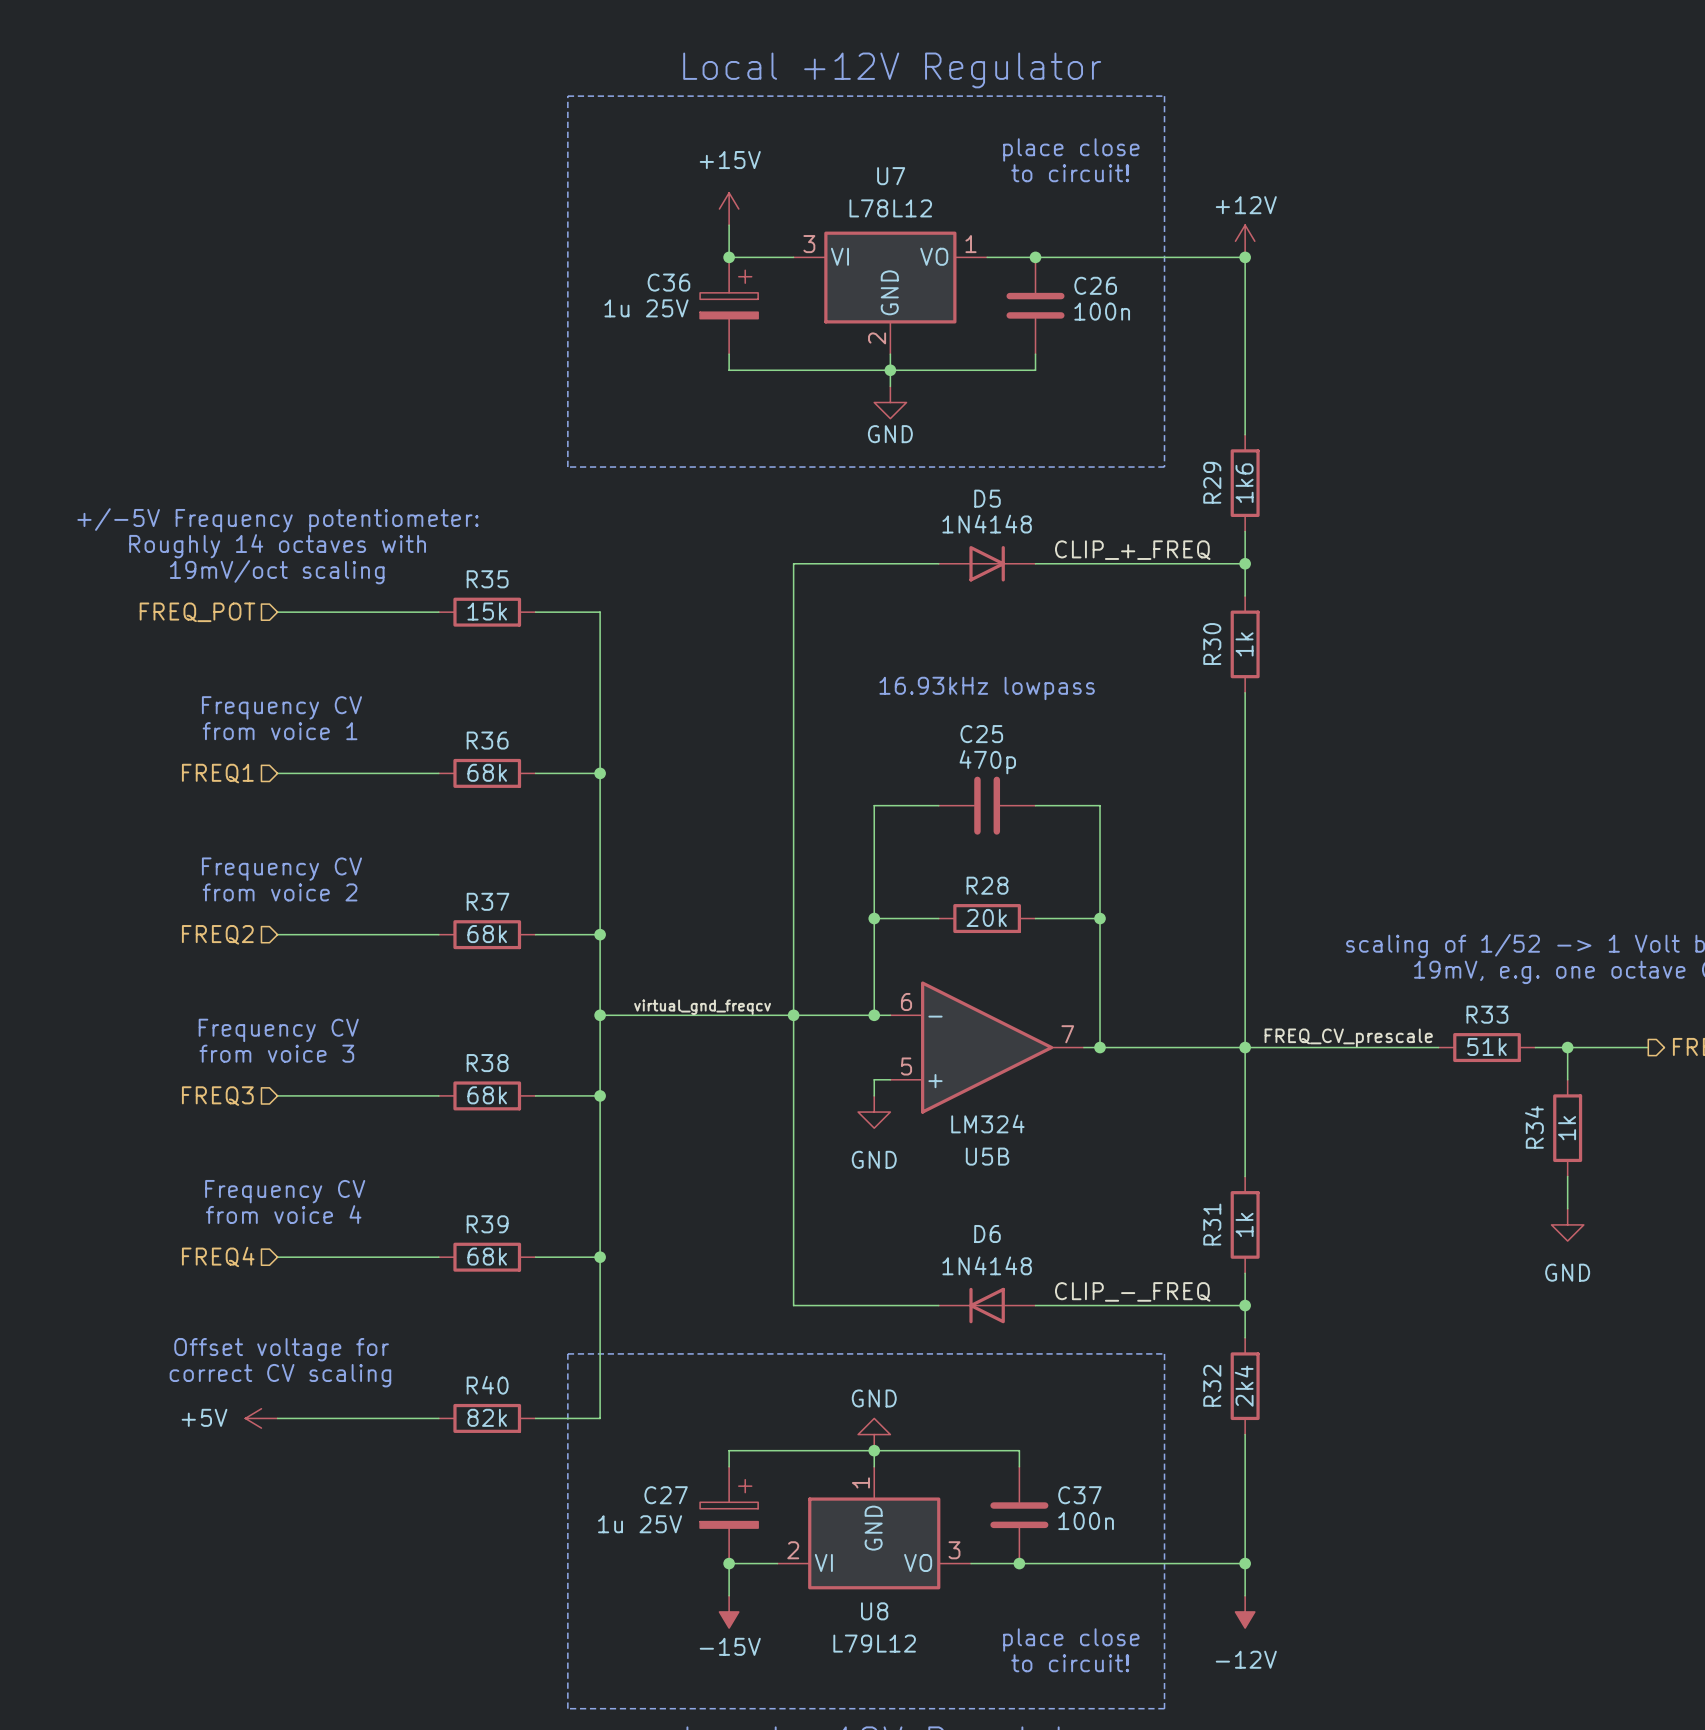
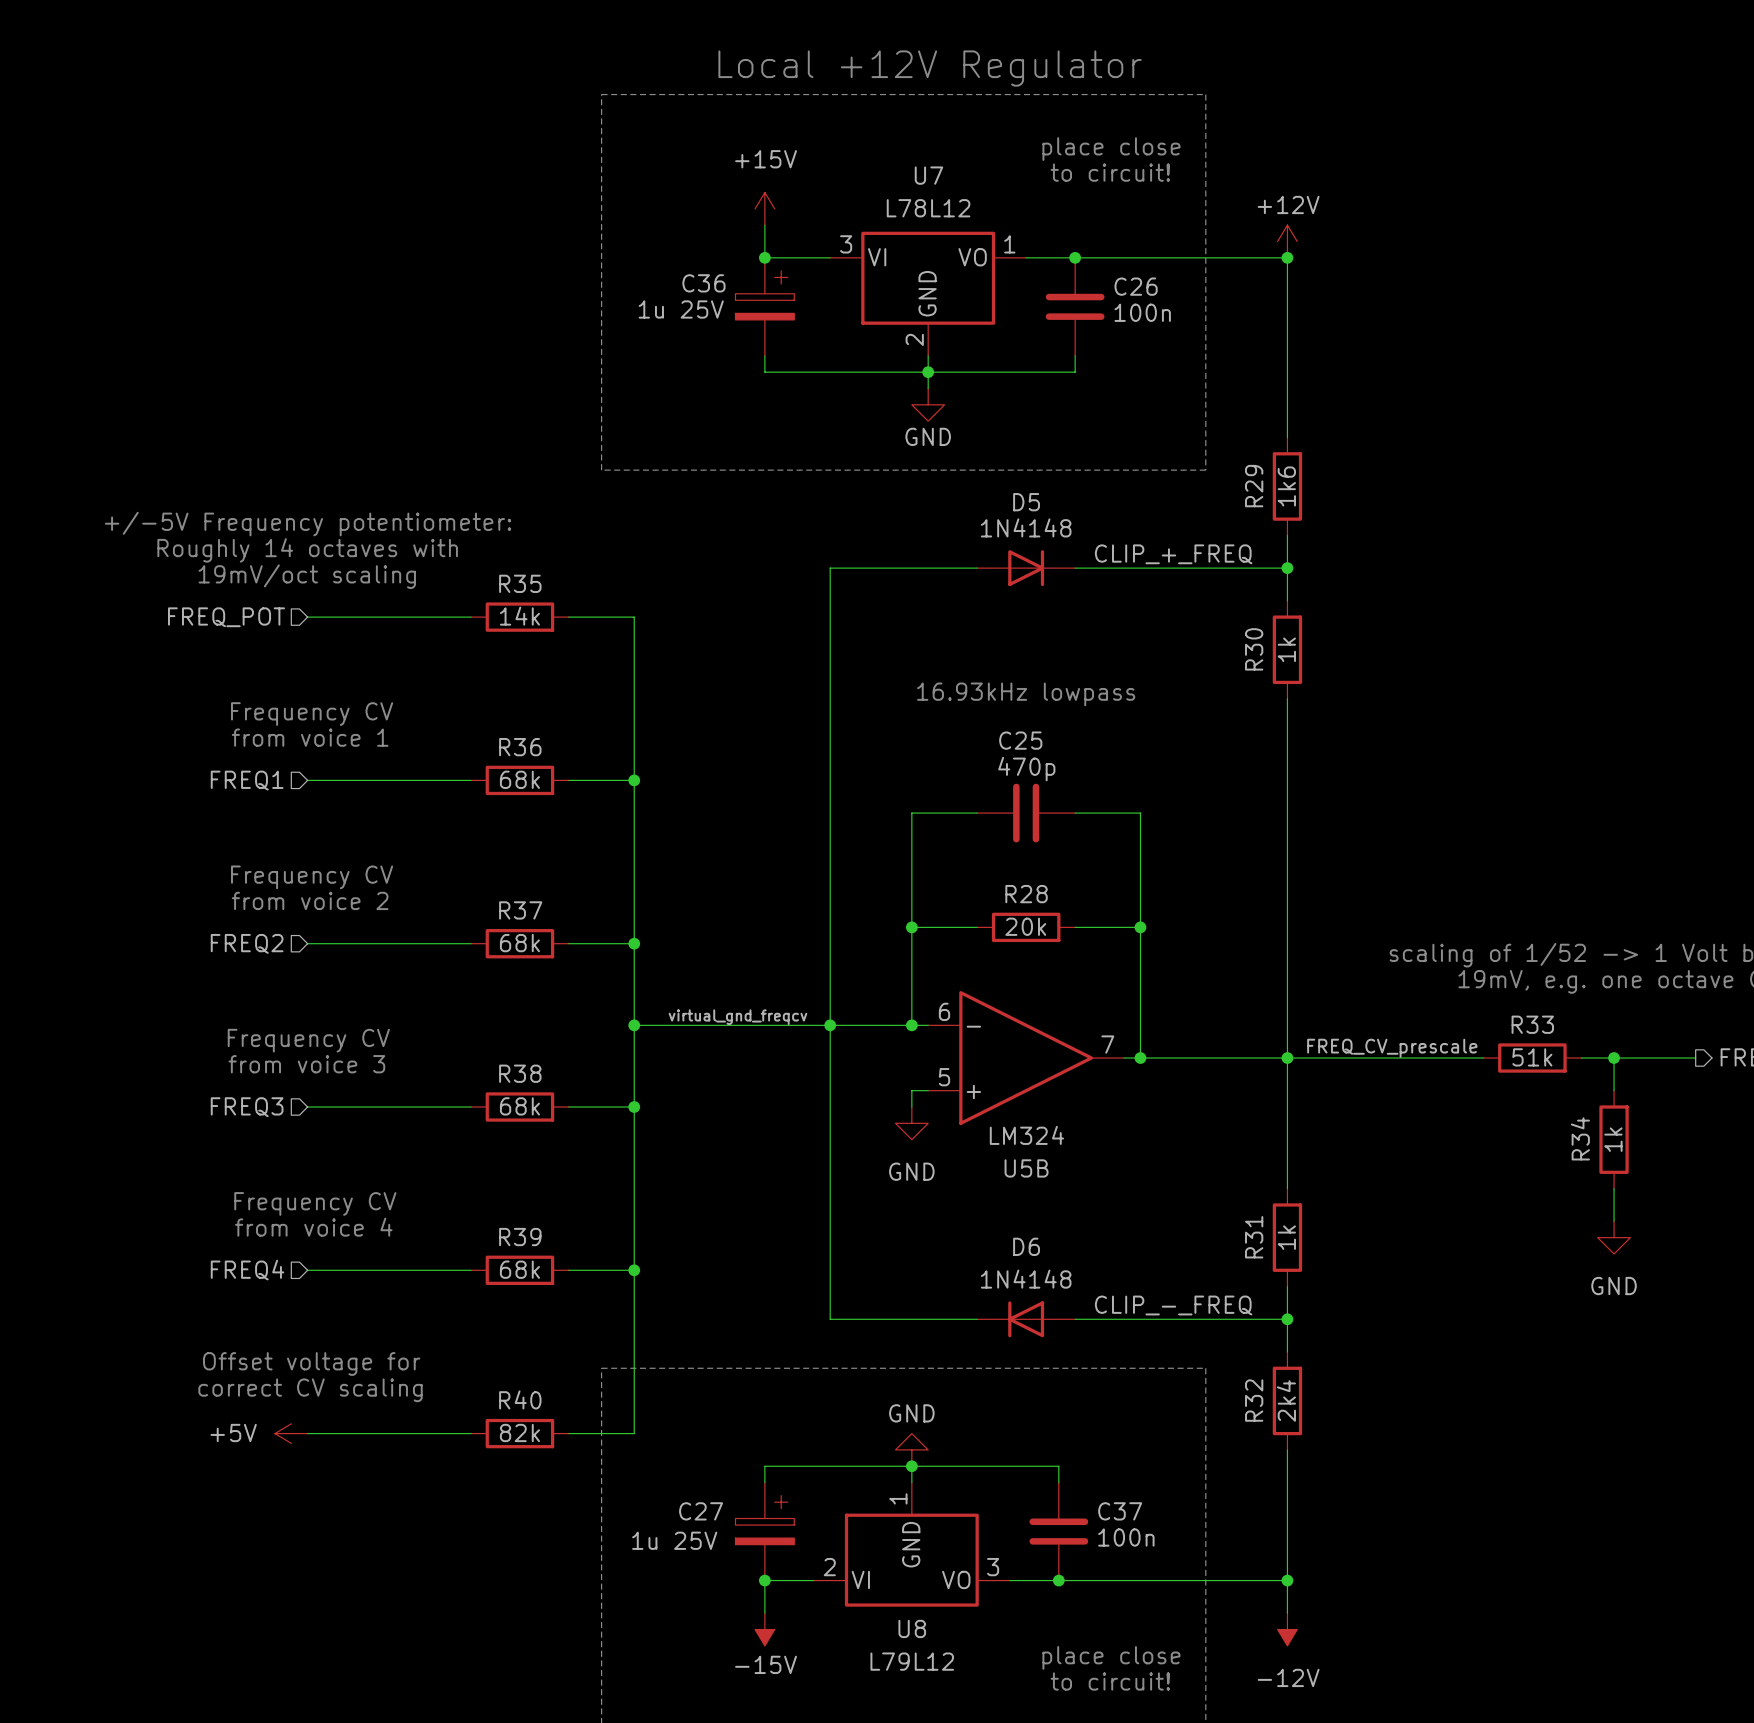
R35 value: 15k (487, 611) -> 14k (519, 616)

